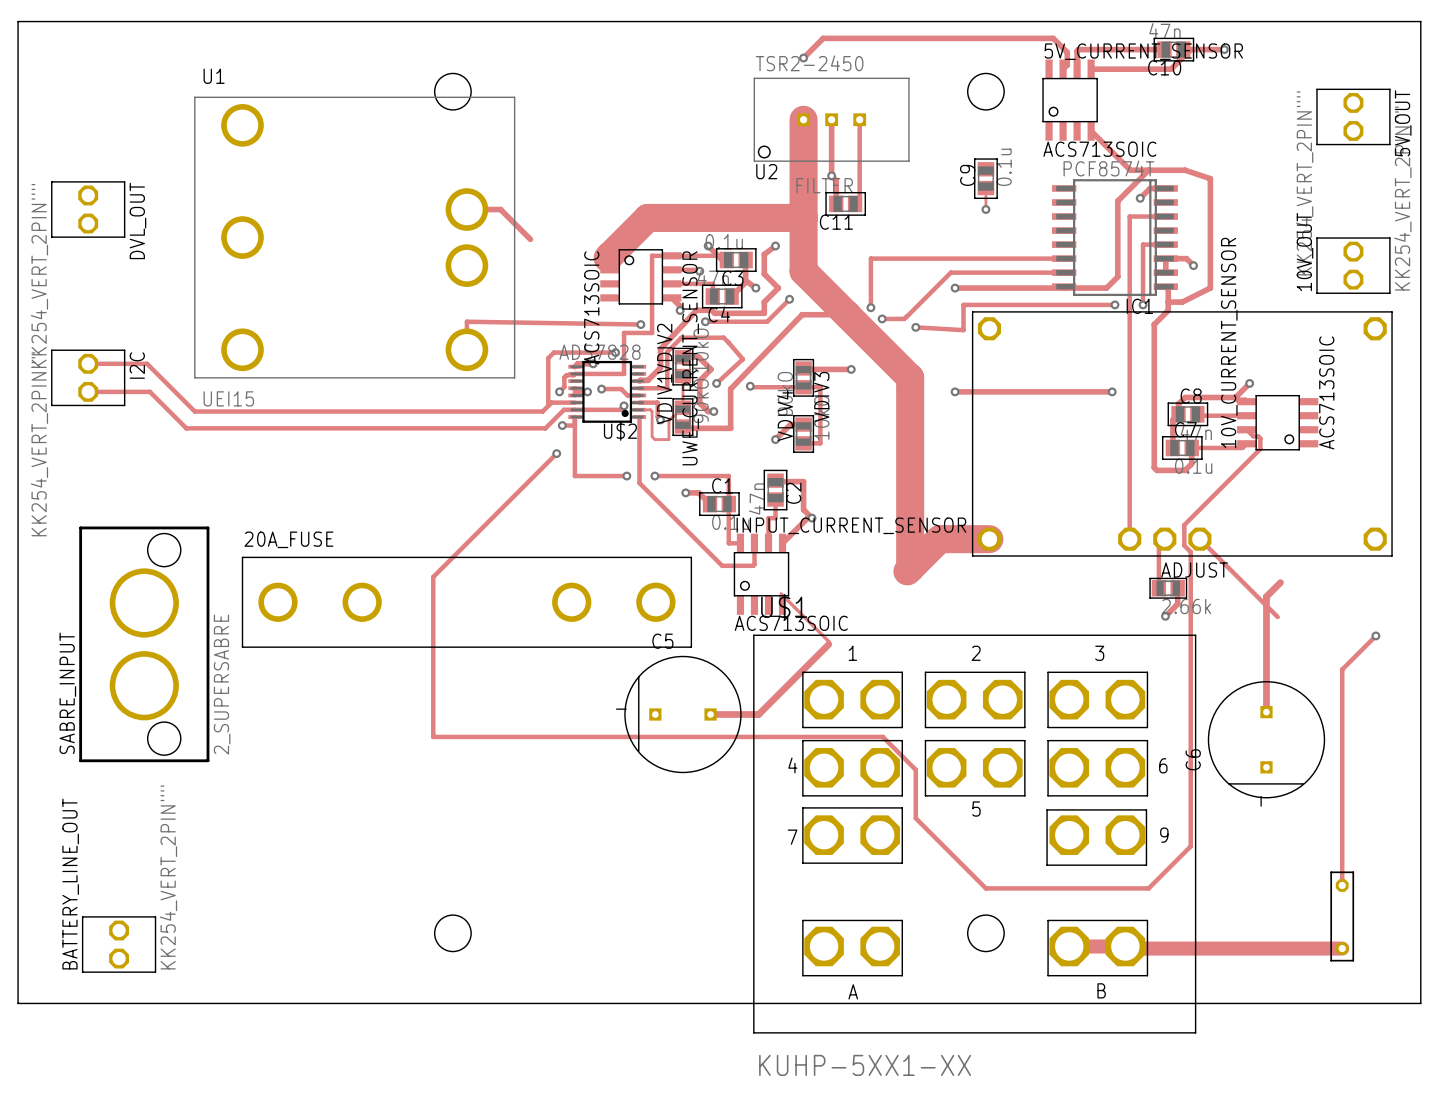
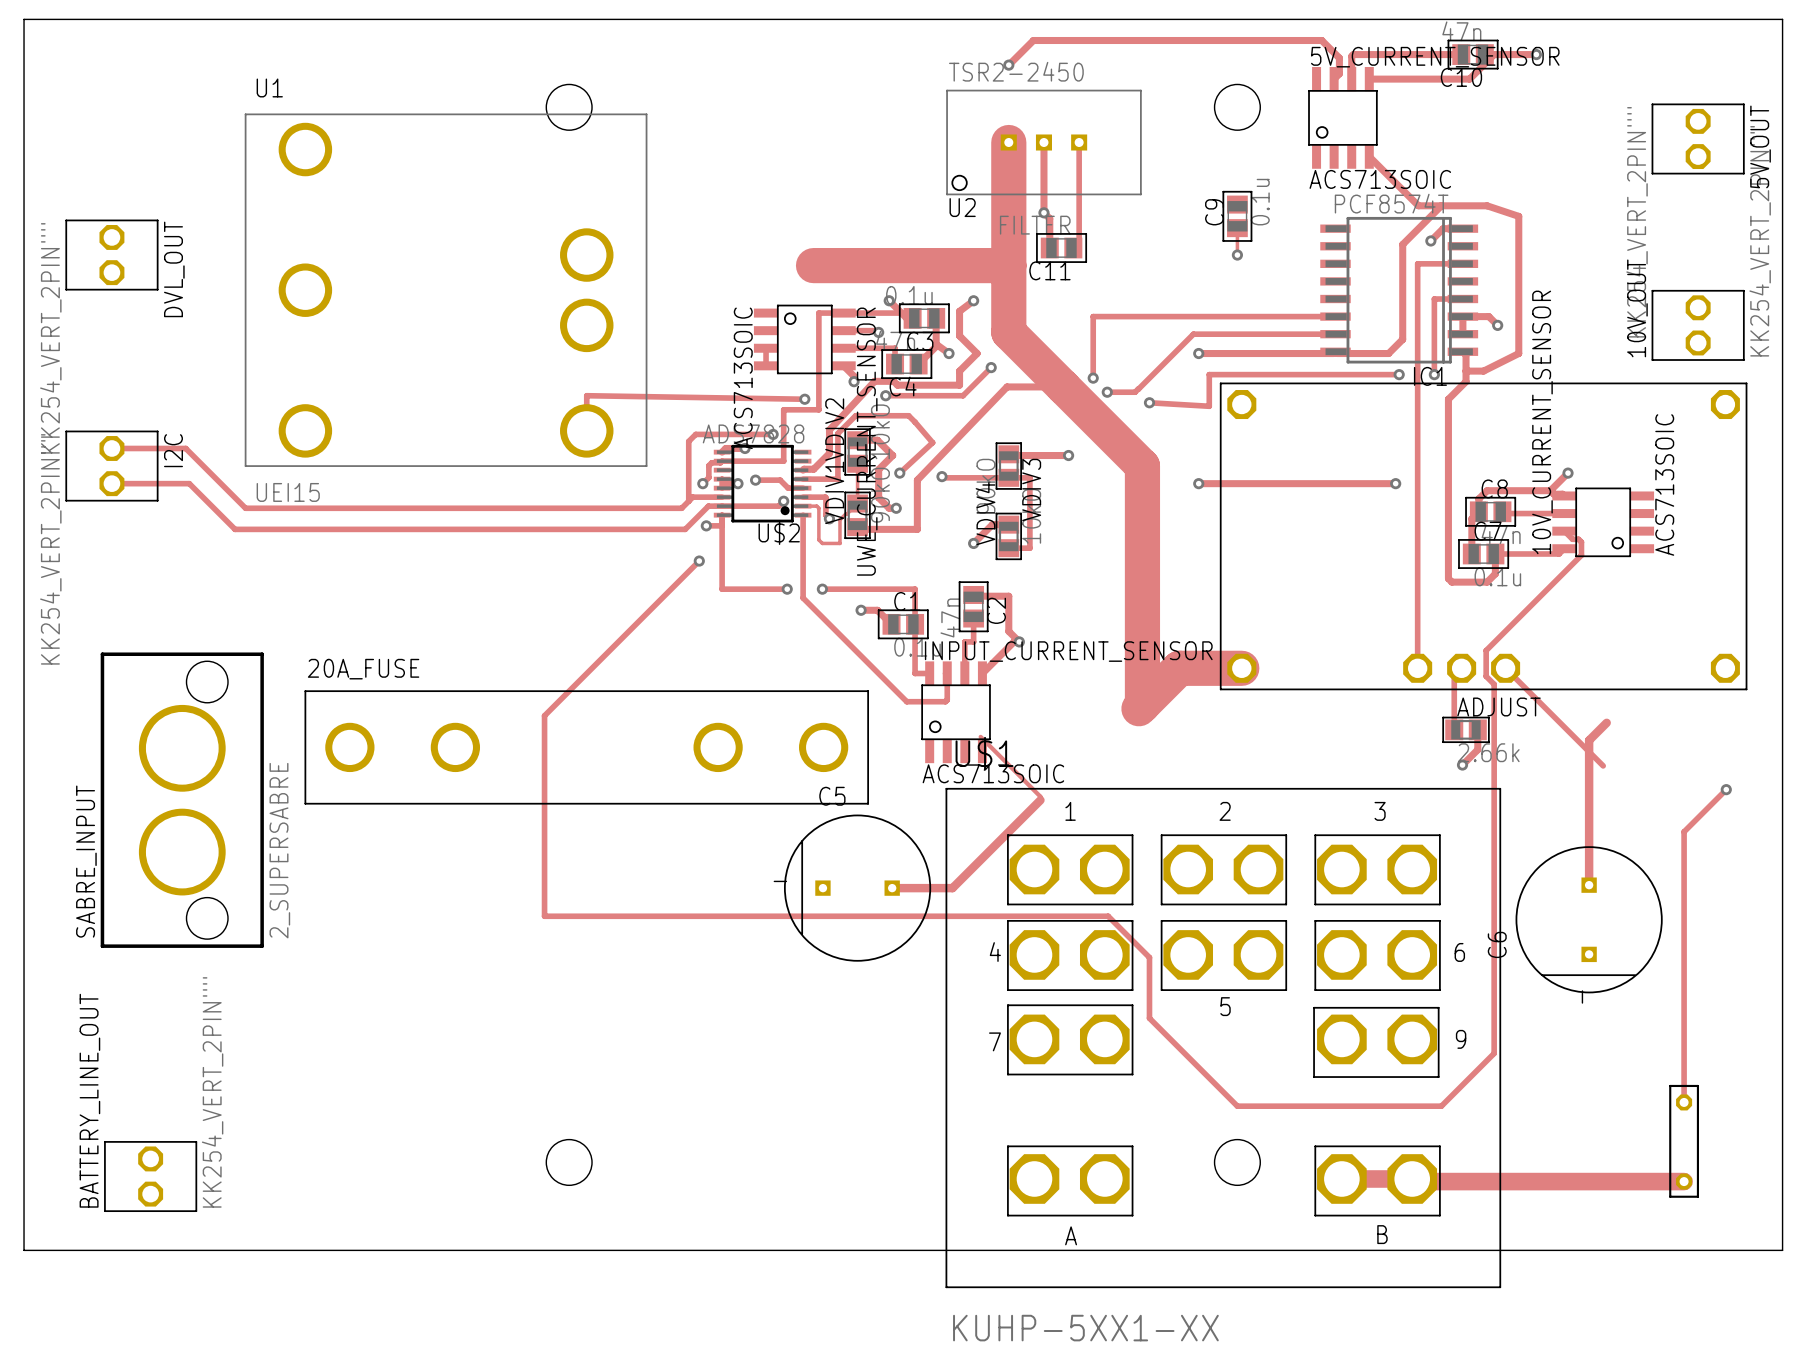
track: (466, 209) (500, 209) (530, 239) -> none
track: (647, 217) (607, 258) -> none
track: none -> (766, 348) (766, 365)

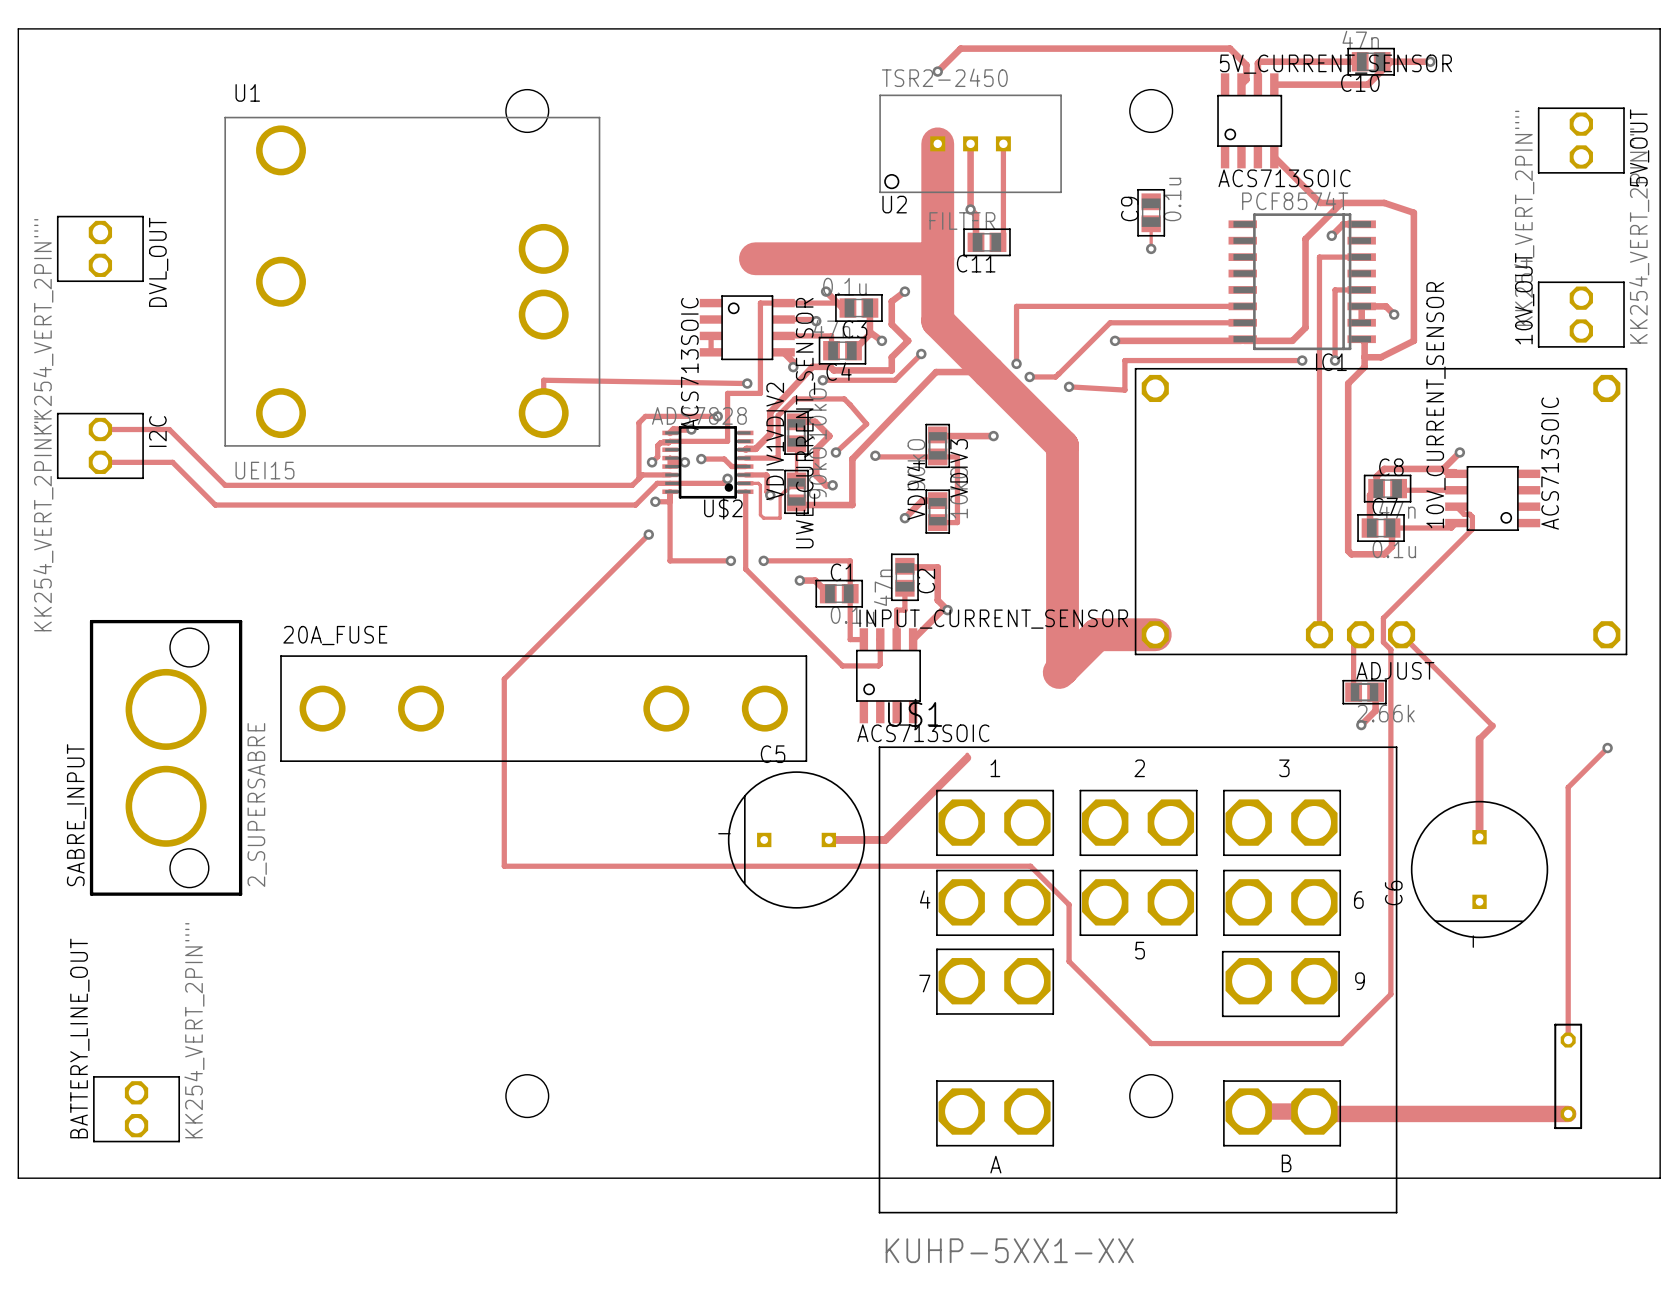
track: (1198, 483) (1395, 483) -> none
via: (1198, 483) -> none
via: (1395, 483) -> none
track: (1606, 722) (1589, 740) (1589, 779) -> (1492, 725) (1479, 738)
track: (980, 736) (1040, 796) -> none

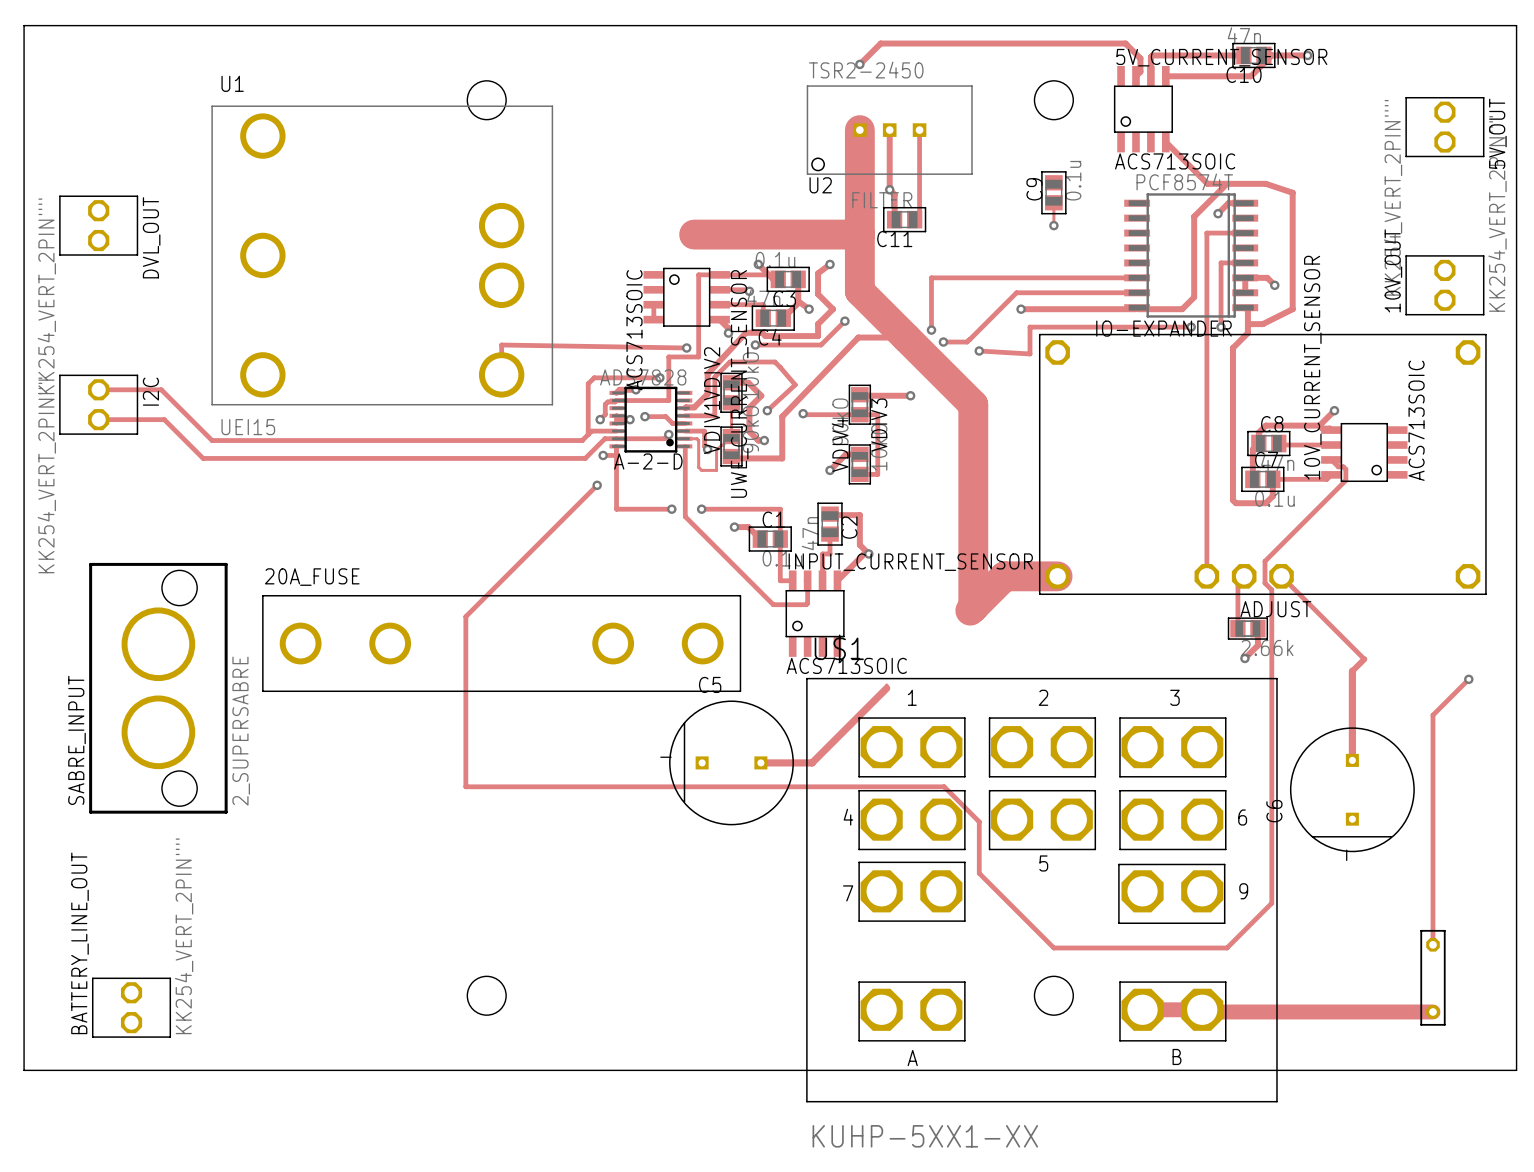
IC1 name: IC1 (1331, 362) -> IO-EXPANDER (1163, 328)
U$2 name: U$2 (723, 508) -> A-2-D (648, 461)

